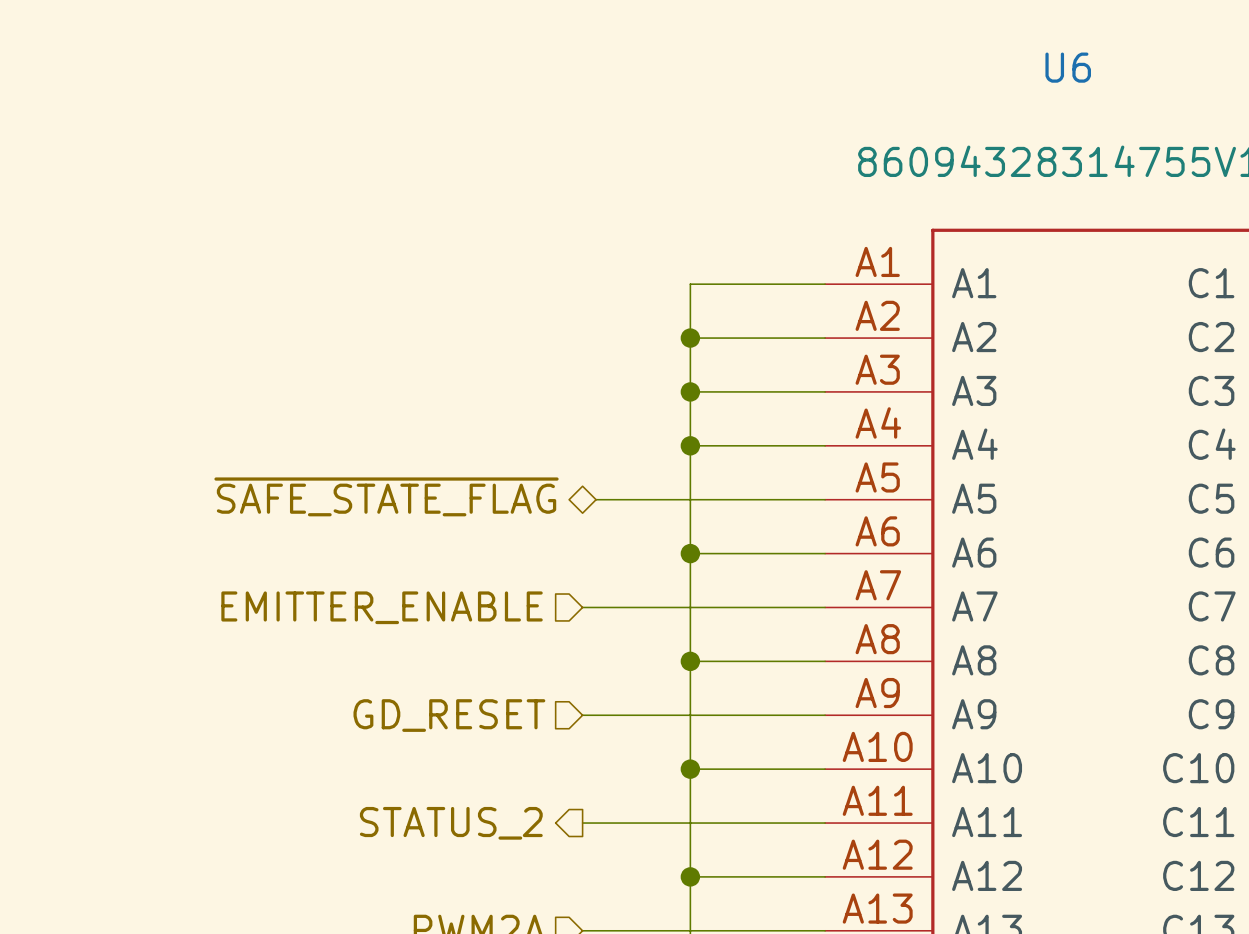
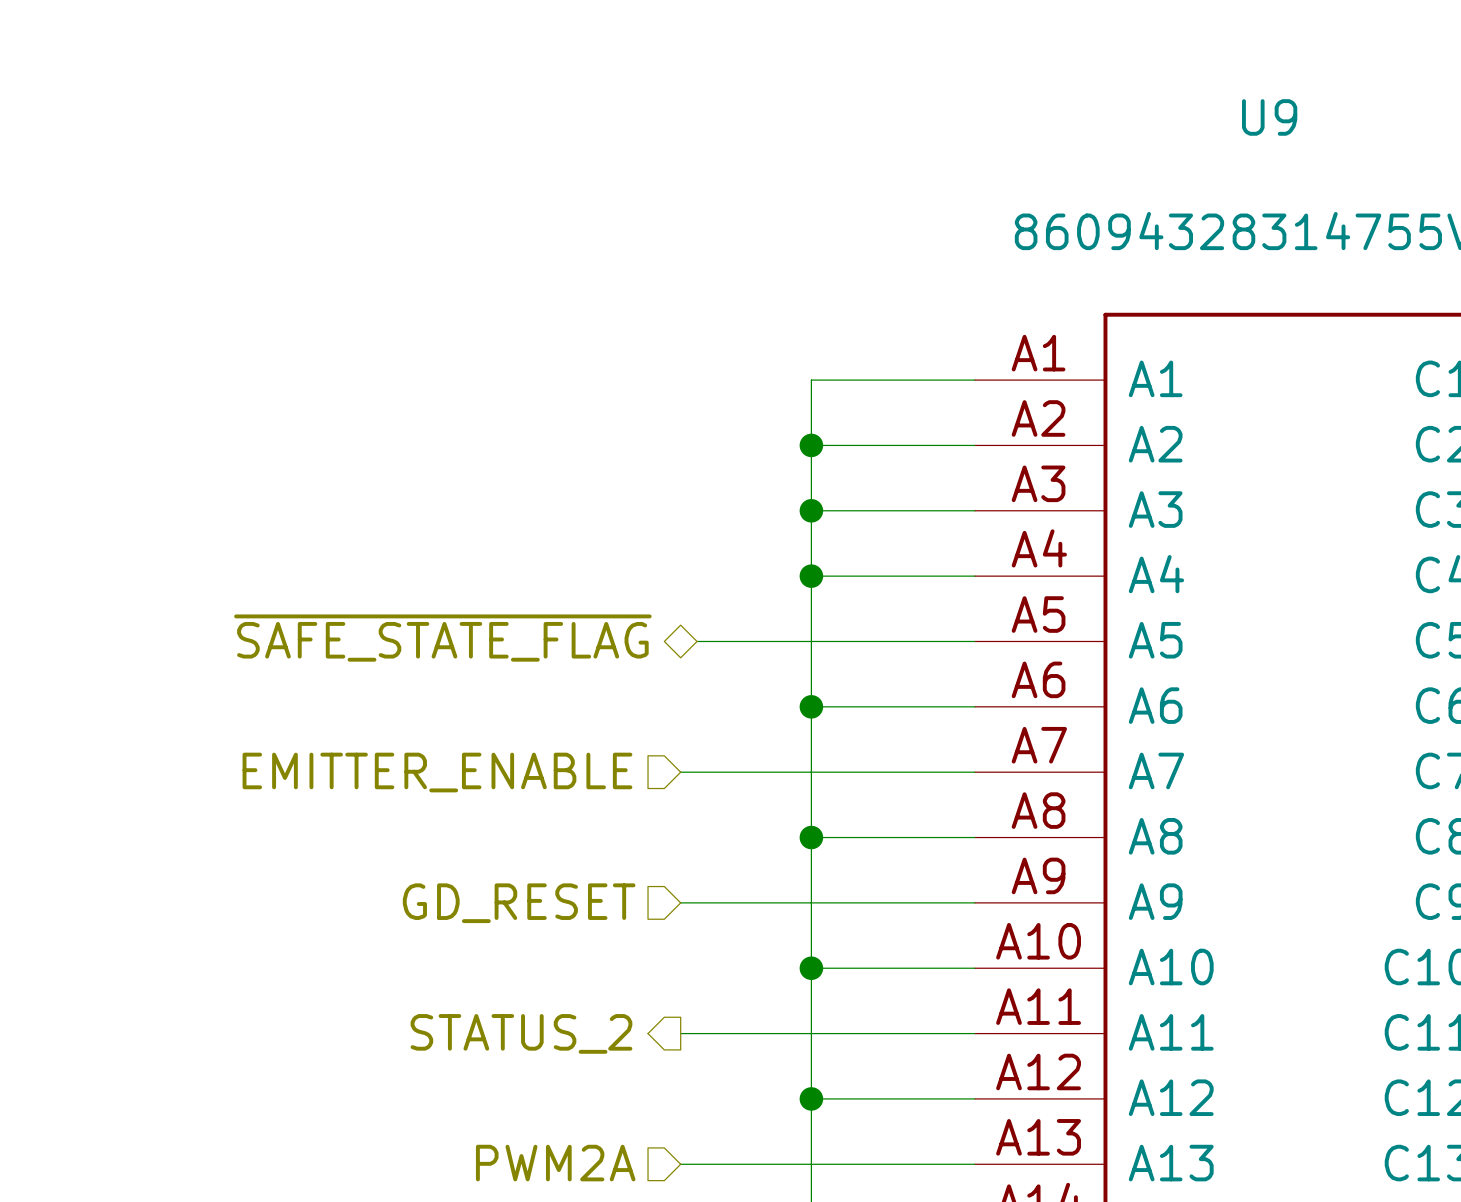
U6 name: U6 (1068, 67) -> U9 (1269, 117)

